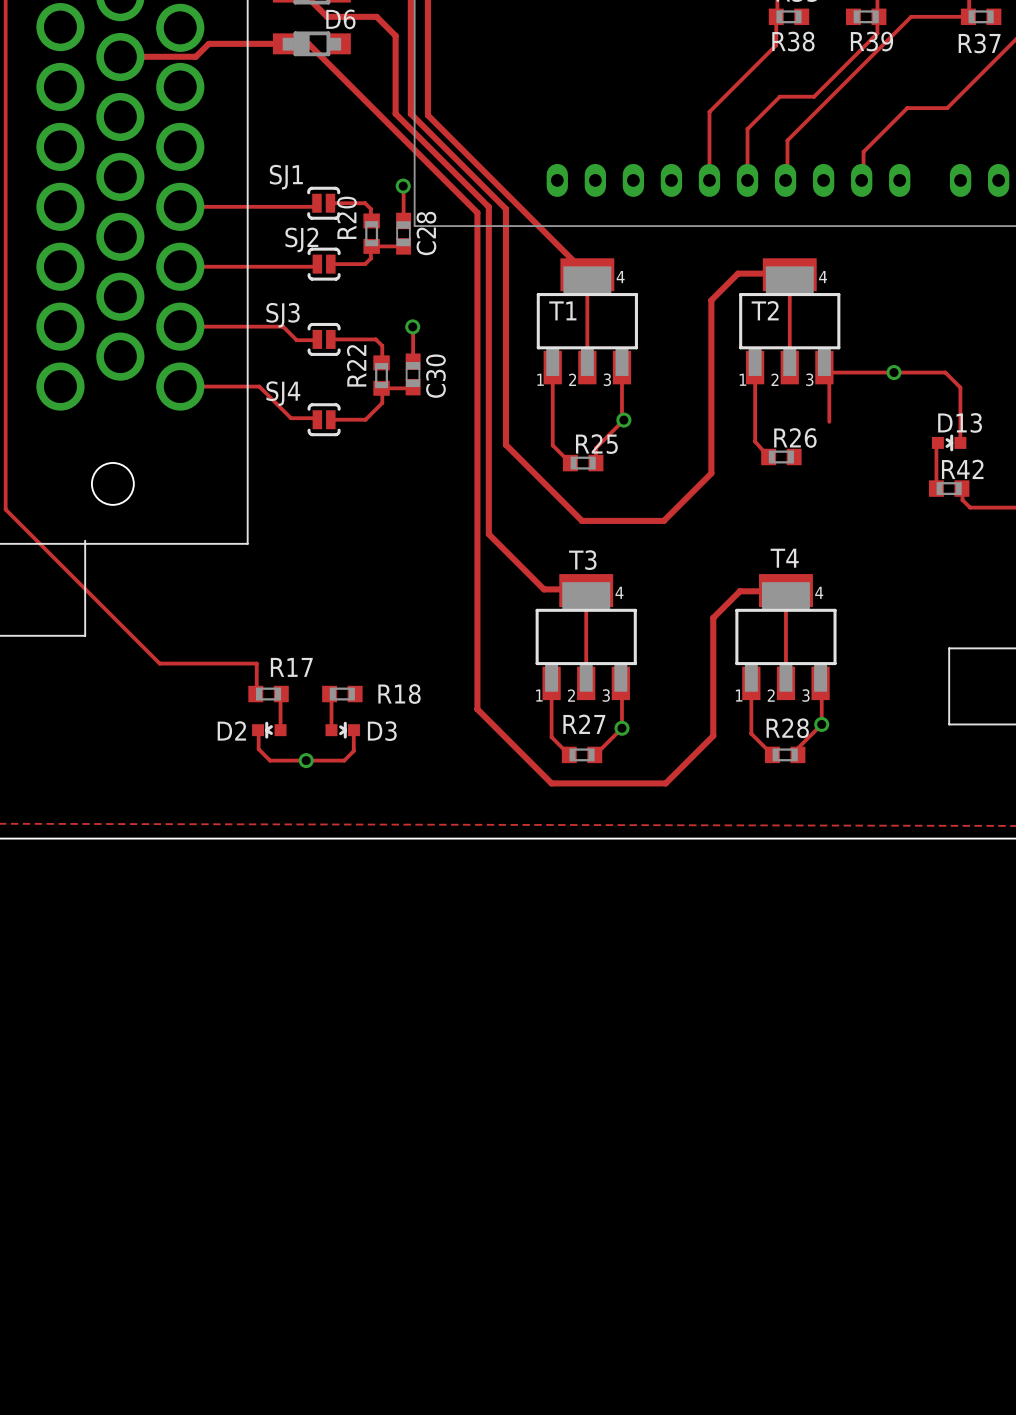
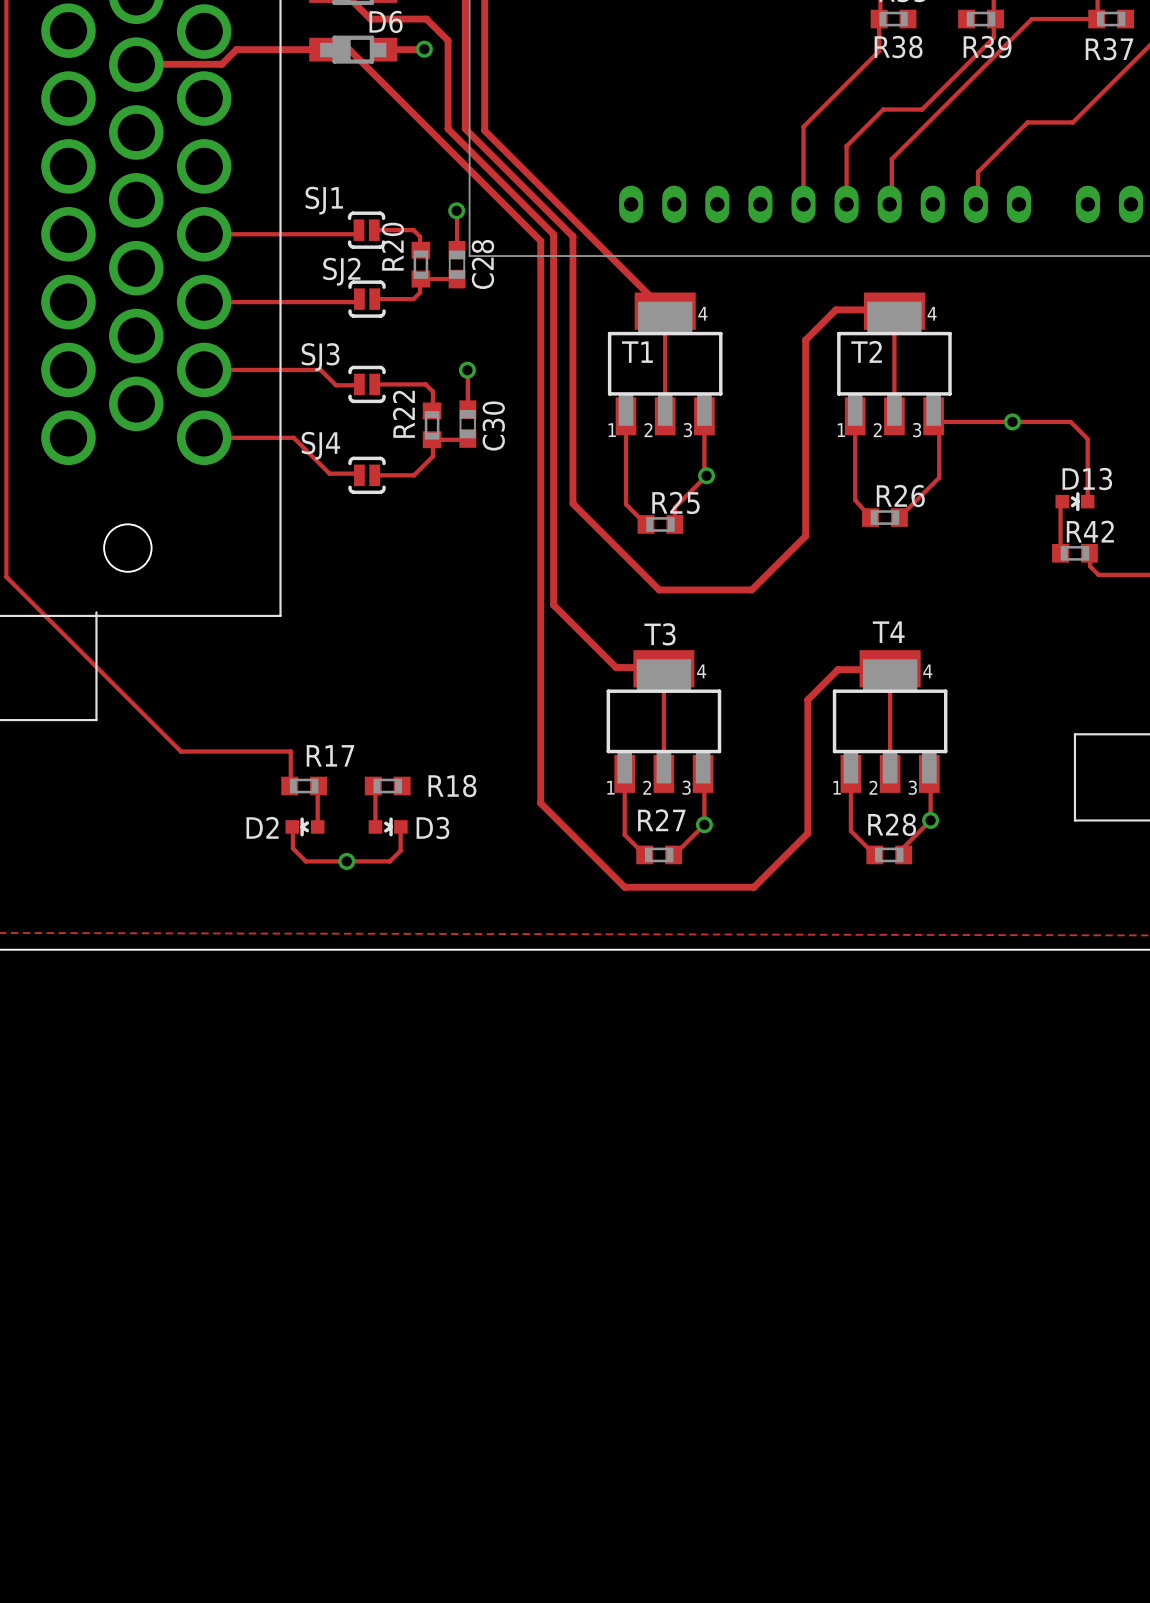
track: none -> (424, 49) (385, 49)
via: none -> (424, 49)
track: none -> (939, 477) (899, 517)

